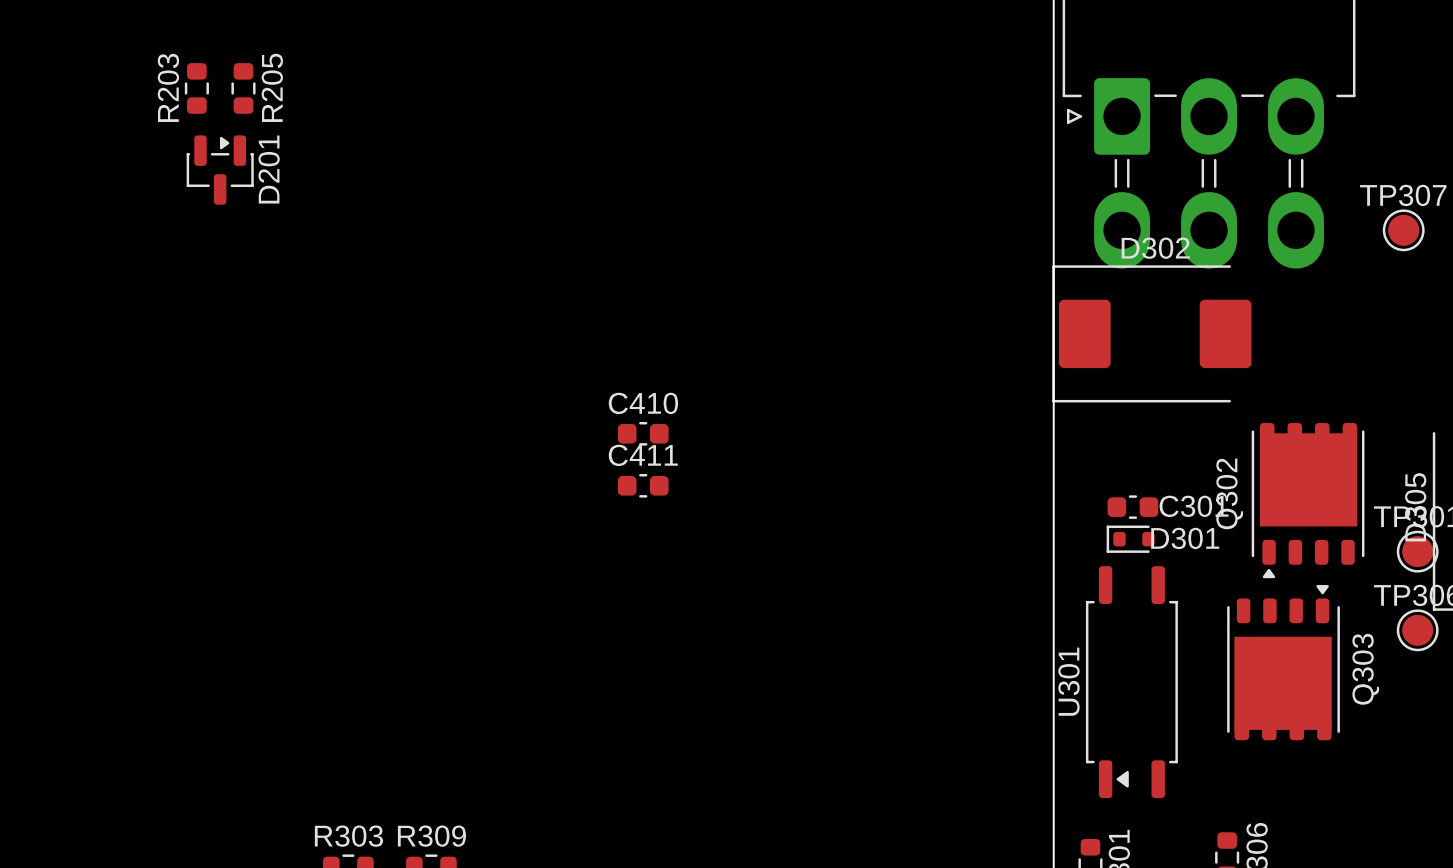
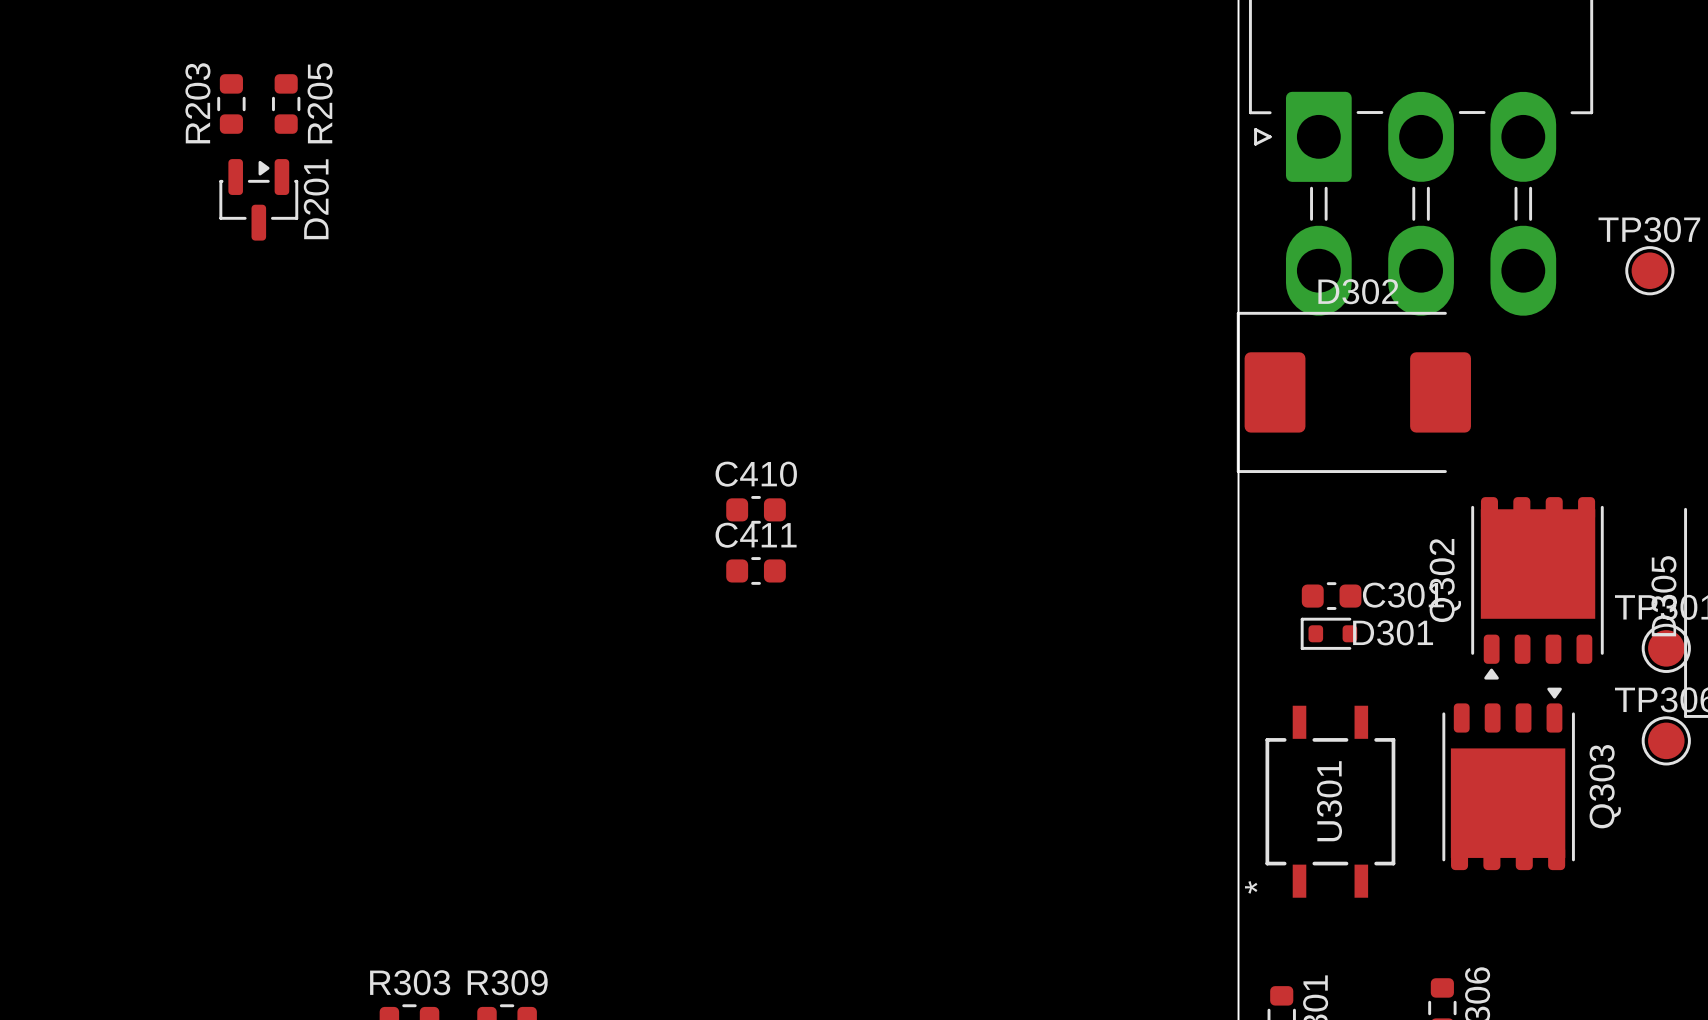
U301 footprint: [1085, 566, 1178, 799] -> [1265, 705, 1396, 898]
U301 name position: U301 (1068, 681) -> U301 (1329, 801)

